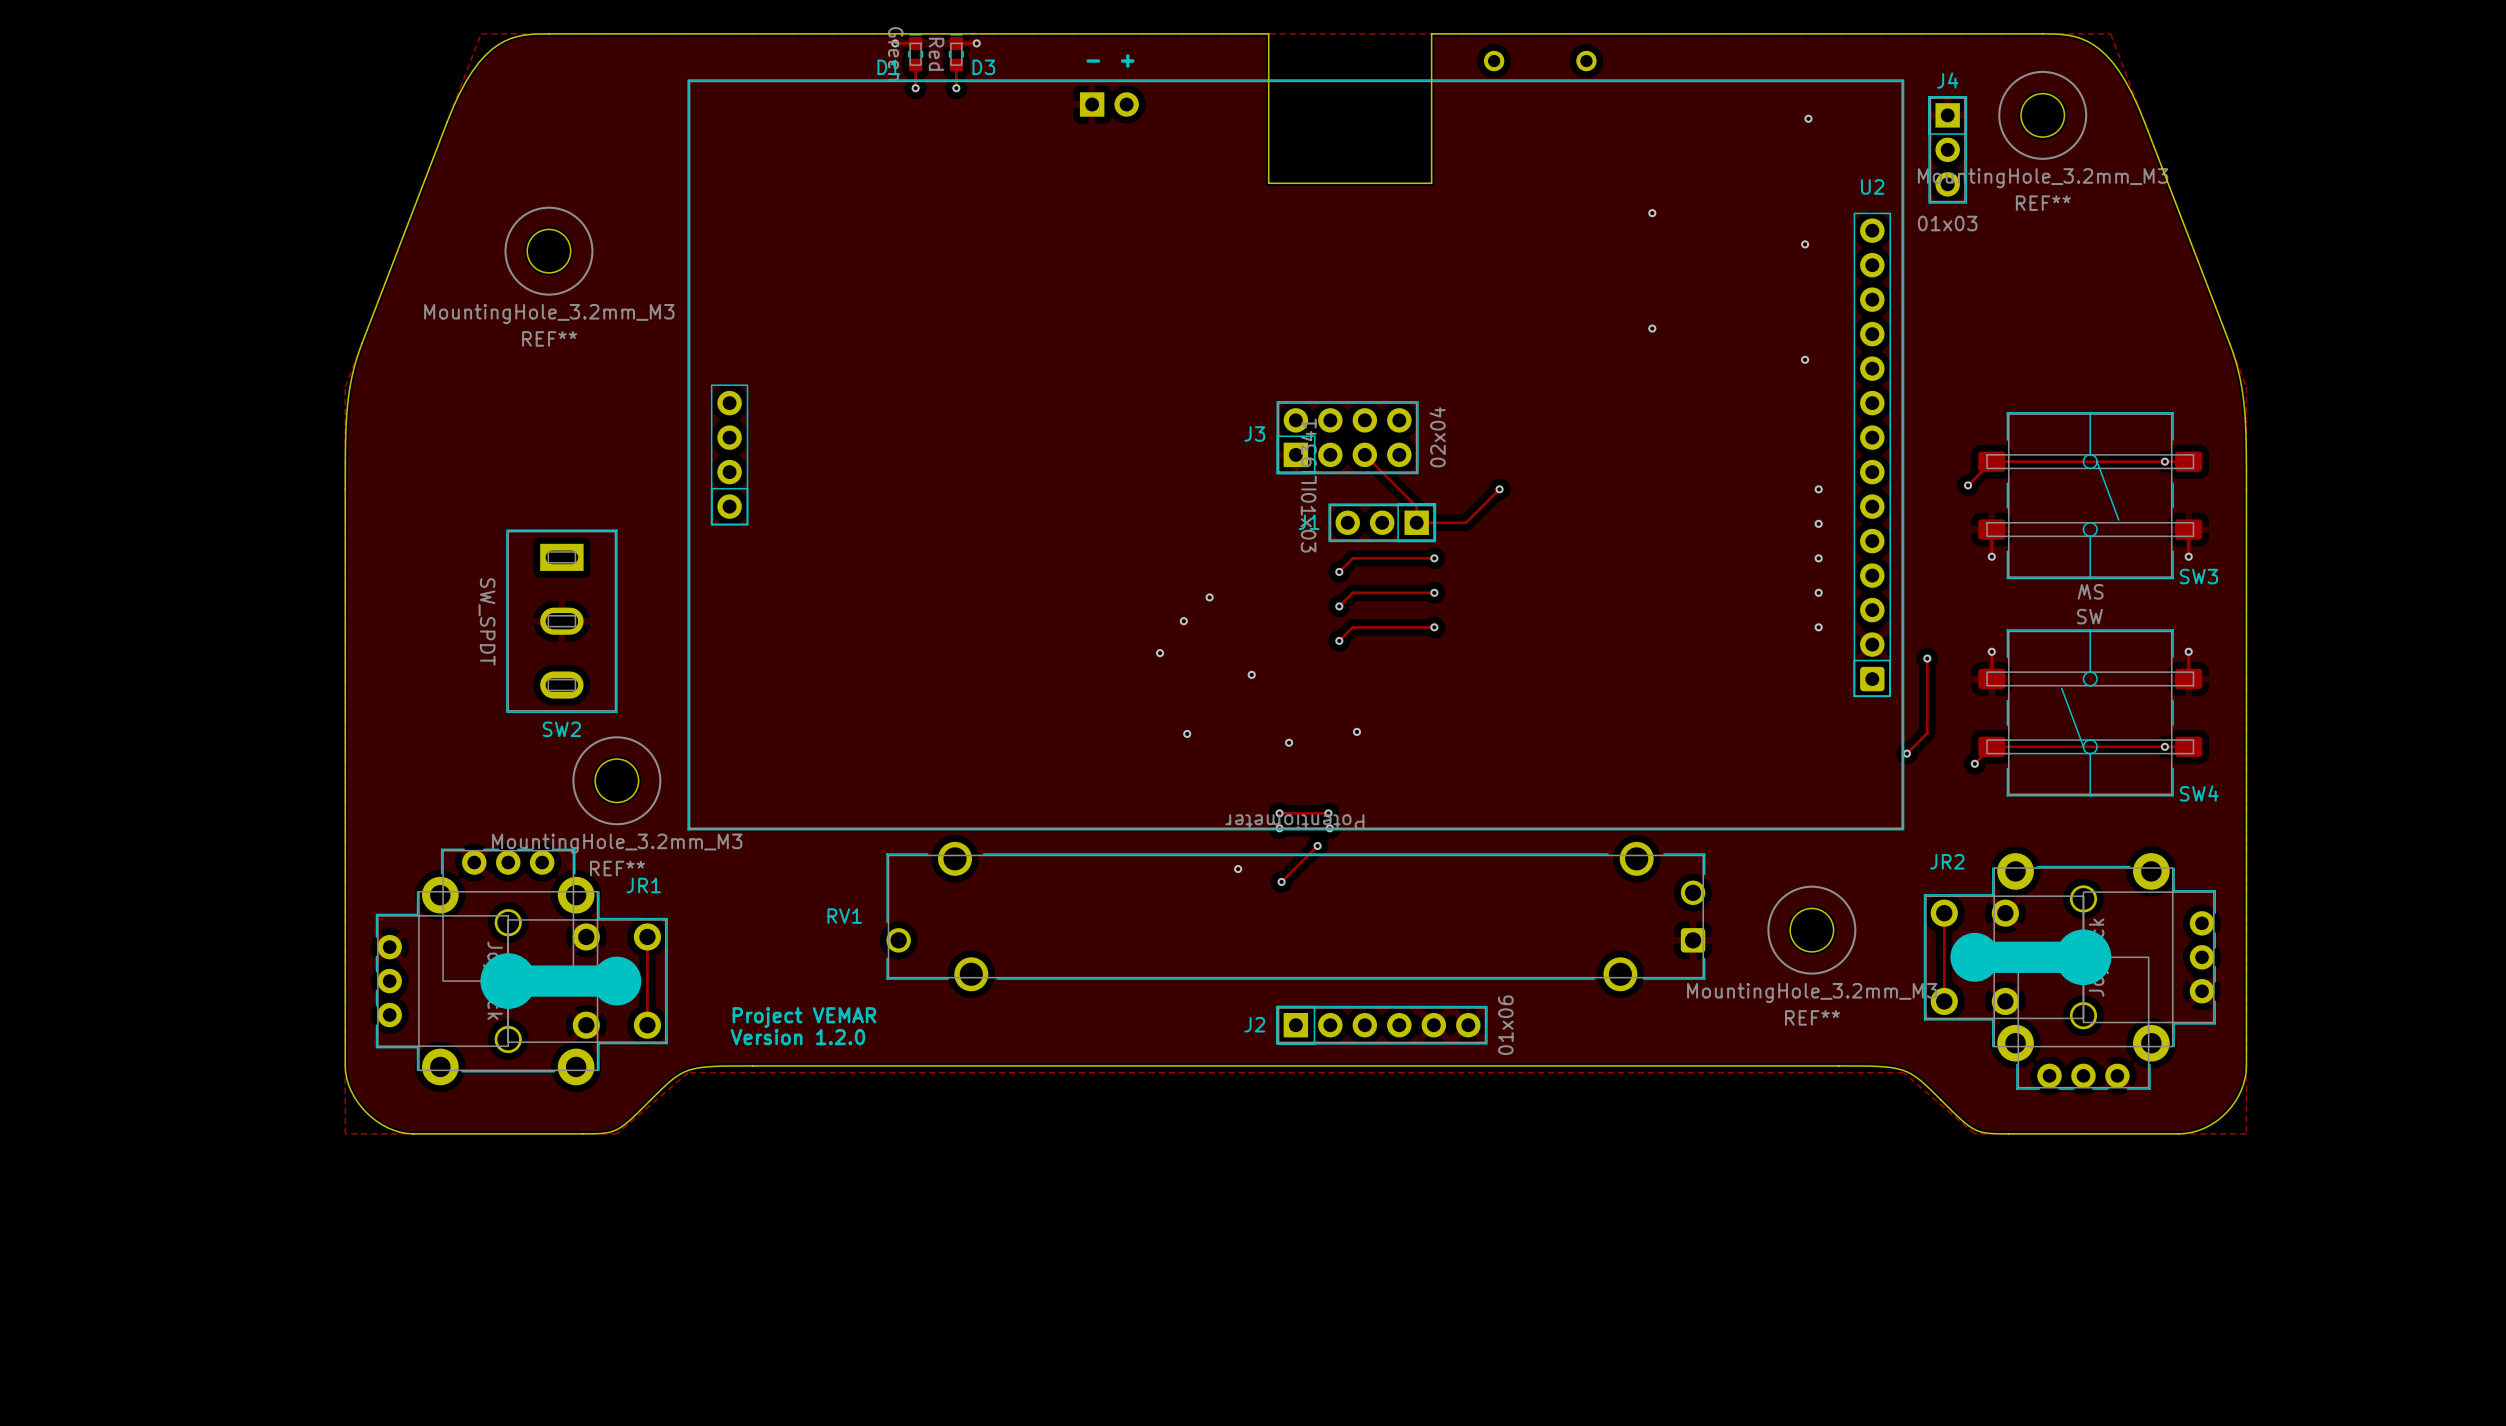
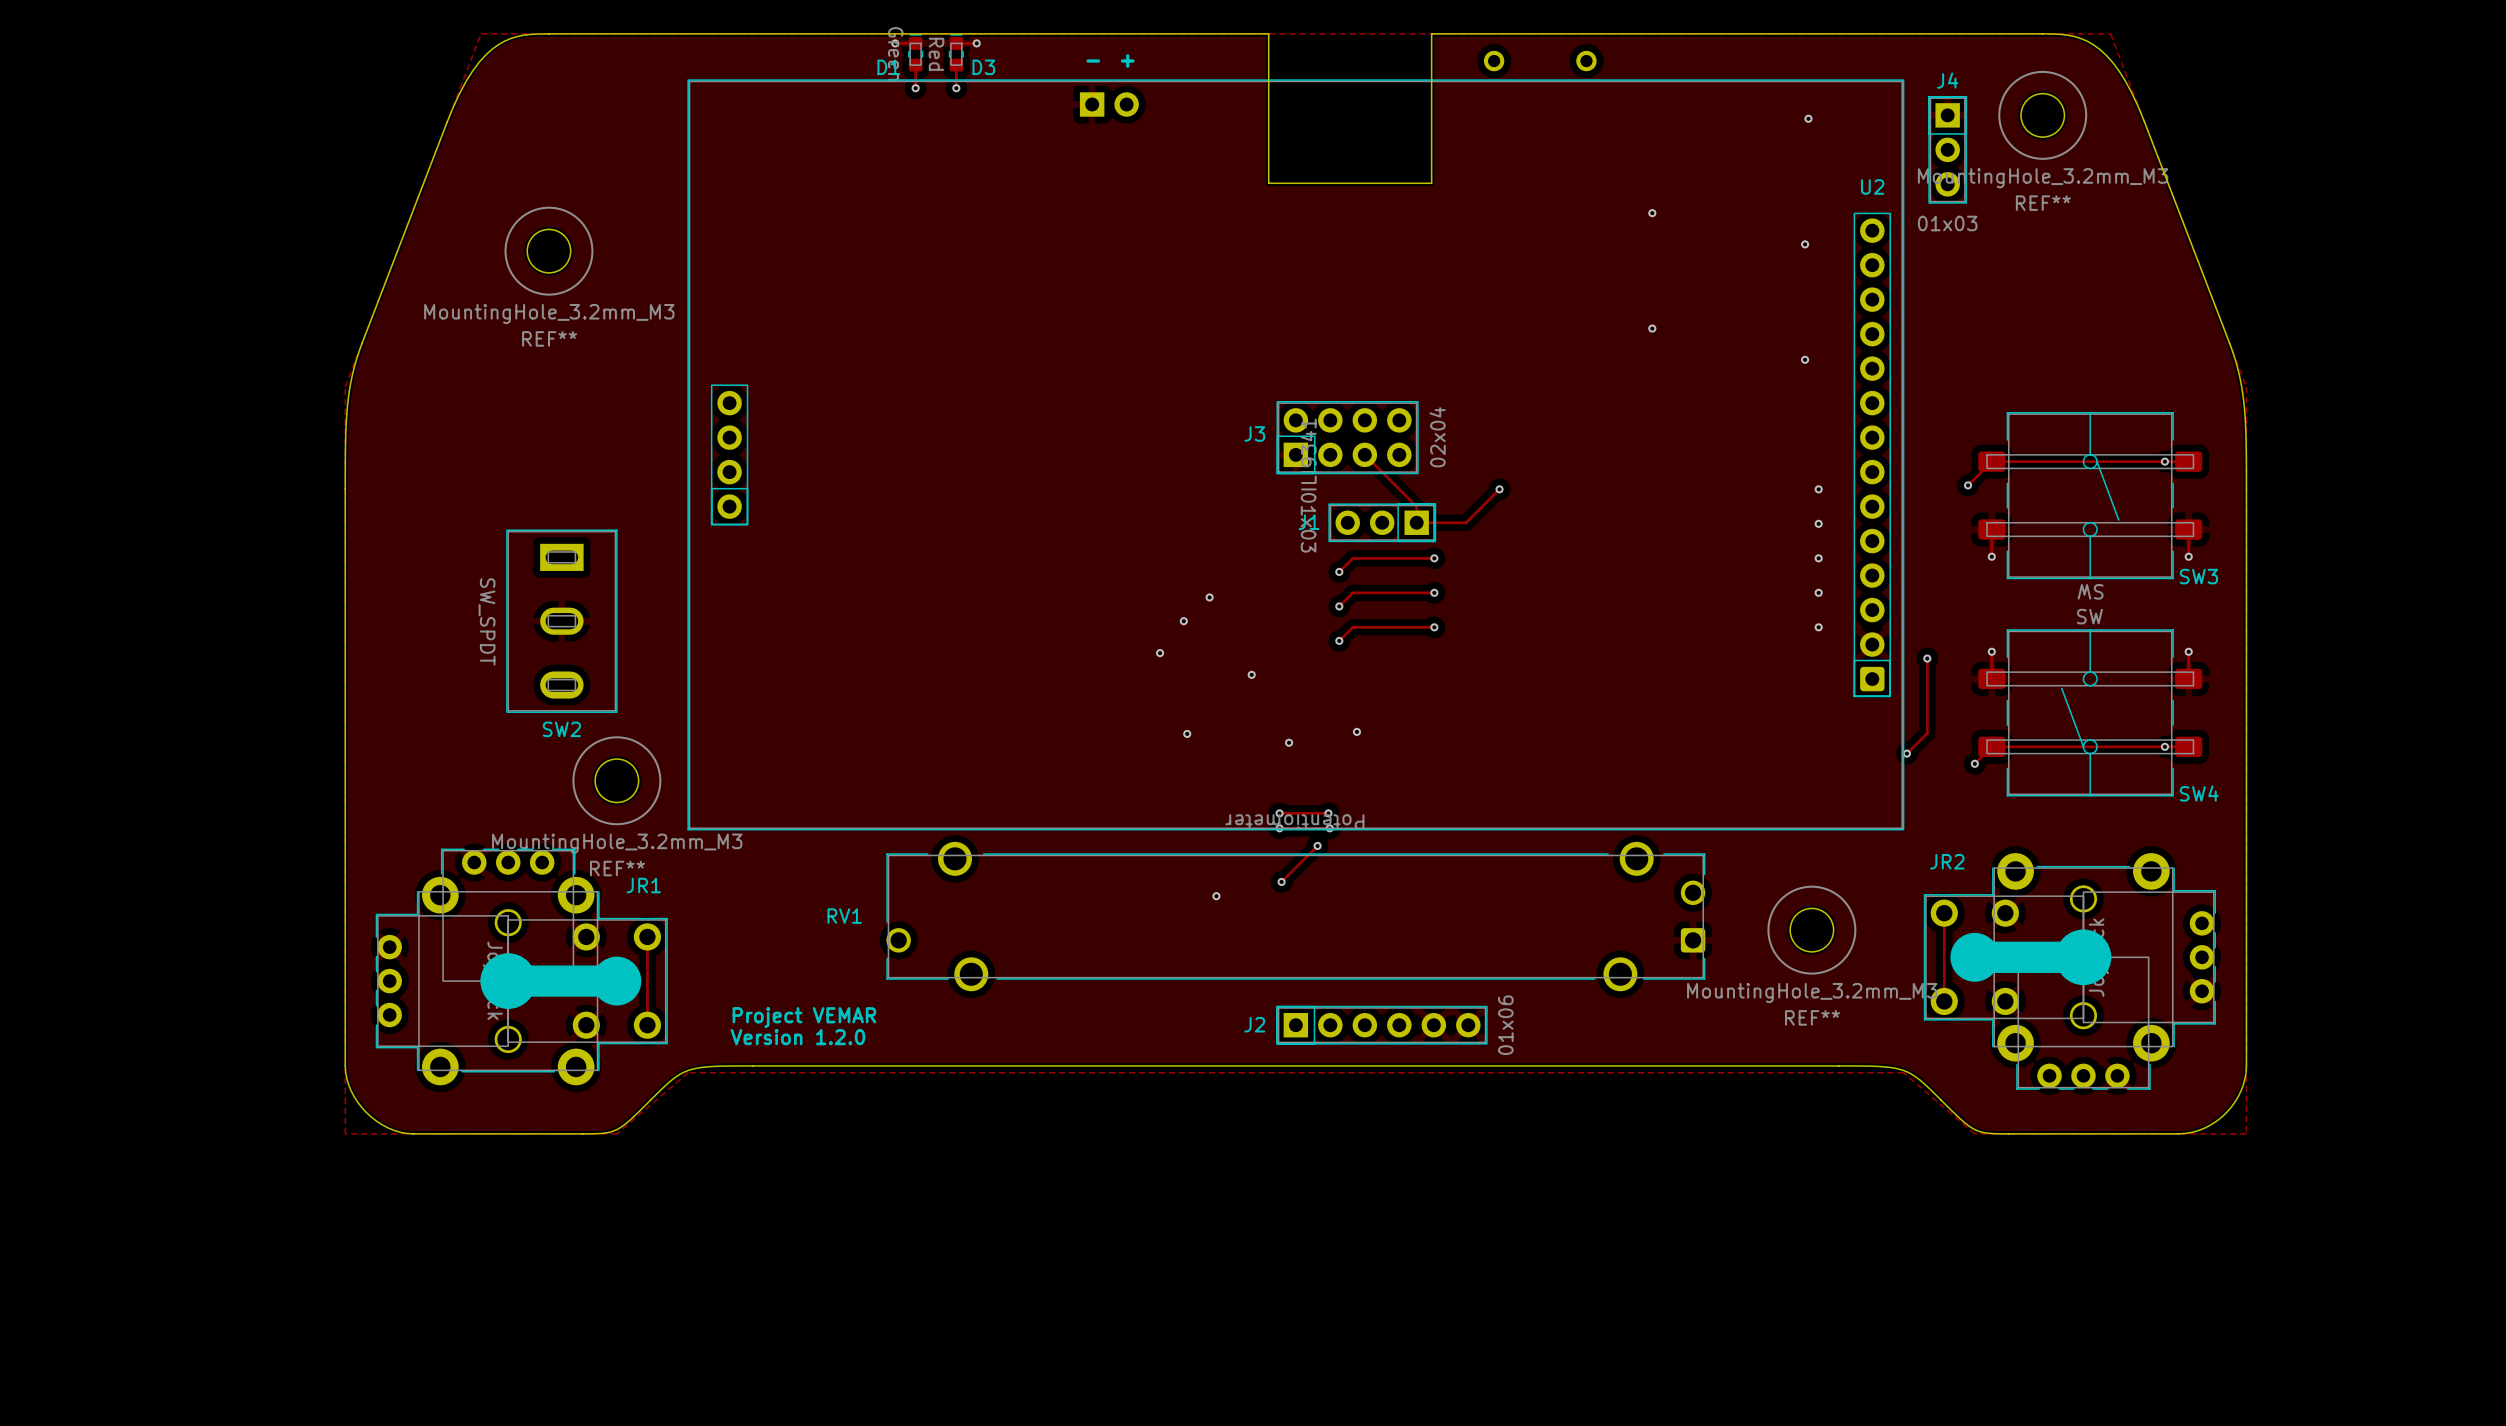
via position: (1238, 869) -> (1216, 896)

